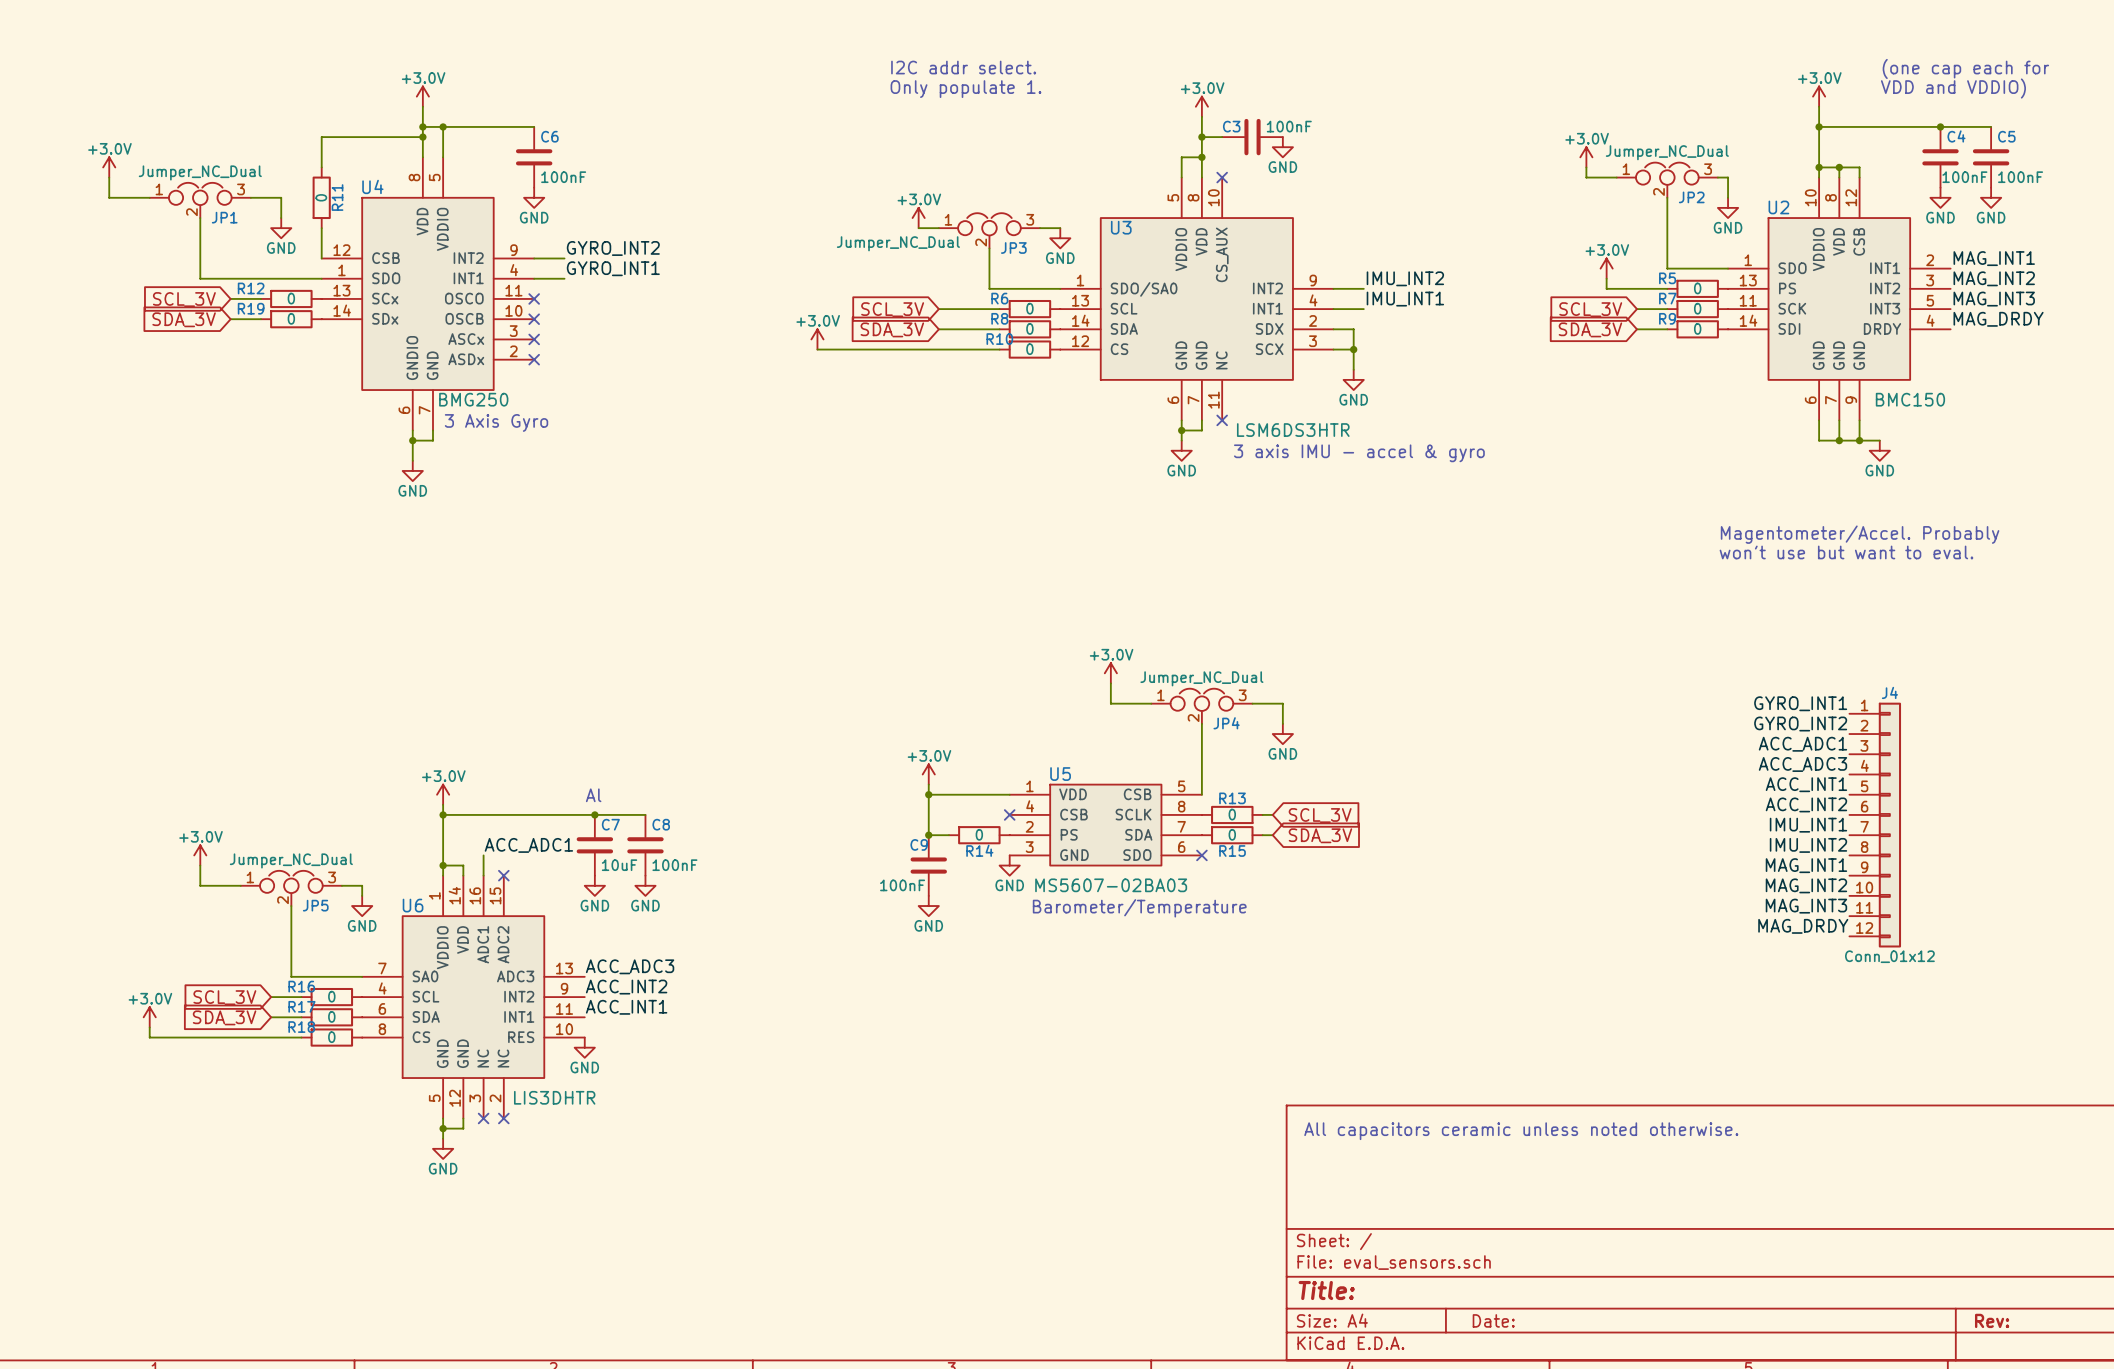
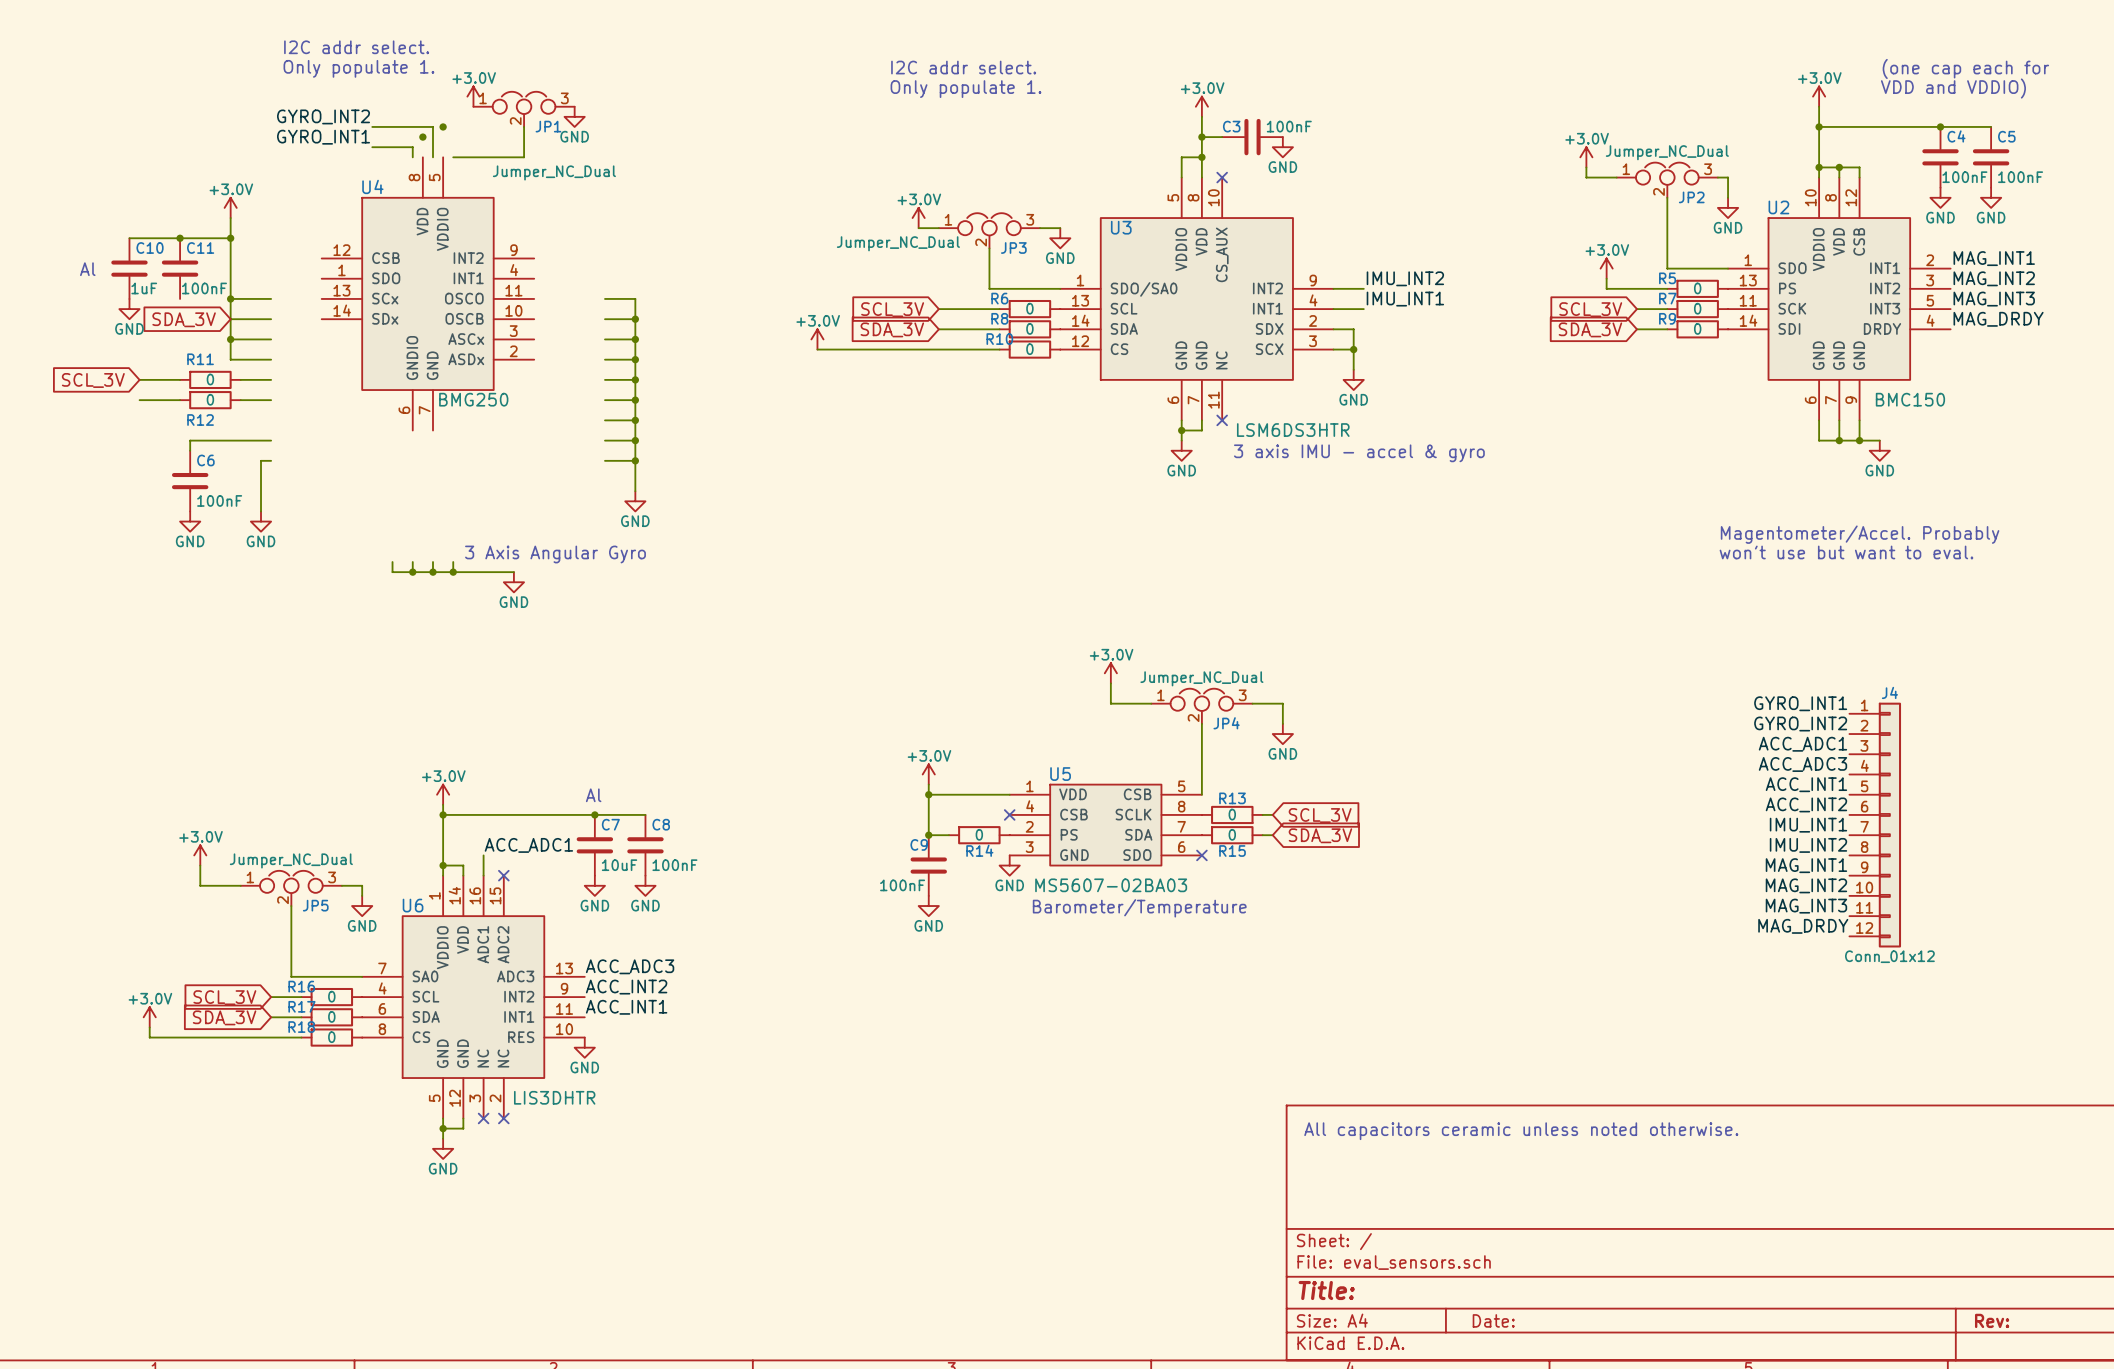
text: none -> I2C addr select. (356, 47)
text: none -> Only populate 1. (358, 68)
power symbol position: +3.0V (422, 96) -> +3.0V (473, 96)
wire: (422, 106) (422, 157) -> none
label: none -> GYRO_INT2 (323, 116)
wire: none -> (372, 126) (422, 126)
junction: (422, 126) -> none
wire: (433, 126) (534, 126) -> (433, 126) (433, 157)
wire: (443, 126) (443, 157) -> none
wire: none -> (524, 126) (524, 157) (453, 157)
label: none -> GYRO_INT1 (323, 137)
wire: (422, 137) (321, 137) (321, 167) -> none
wire: none -> (372, 147) (412, 147) (412, 157)
C6 position: (534, 157) -> (190, 481)
power symbol: +3.0V (109, 167) -> none
JP1 value position: Jumper_NC_Dual (200, 172) -> Jumper_NC_Dual (554, 172)
wire: (109, 177) (109, 197) (149, 197) -> none
wire: (250, 197) (281, 197) (281, 218) -> none
R11 rotation: 0° (321, 197) -> 90° clockwise (210, 379)
R11 position: (321, 197) -> (210, 379)
R11 name position: R11 (337, 197) -> R11 (200, 359)
power symbol position: GND (534, 197) -> GND (574, 116)
JP1 position: (200, 200) -> (524, 109)
power symbol: none -> +3.0V (230, 207)
wire: (200, 218) (200, 278) (321, 278) -> none
wire: none -> (230, 218) (230, 359) (271, 359)
power symbol: GND (281, 228) -> none
wire: (321, 228) (321, 258) -> none
wire: none -> (129, 238) (230, 238)
junction: none -> (180, 238)
junction: none -> (230, 238)
label: GYRO_INT2 (613, 248) -> none
wire: (534, 258) (564, 258) -> (604, 319) (635, 319)
C10: none -> 1uF (129, 268)
C11: none -> 100nF (180, 268)
label: GYRO_INT1 (613, 268) -> none
text: none -> Al (87, 269)
wire: (534, 278) (564, 278) -> (604, 339) (635, 339)
R12 name position: R12 (251, 288) -> R12 (200, 420)
junction: none -> (230, 298)
R12 position: (291, 298) -> (210, 400)
no-connect mark: (534, 298) -> none
wire: none -> (604, 298) (635, 298) (635, 491)
global label position: SCL_3V (184, 299) -> SCL_3V (93, 380)
power symbol: none -> GND (129, 309)
R19: 0 (291, 319) -> none
no-connect mark: (534, 319) -> none
junction: none -> (635, 319)
wire: none -> (230, 339) (271, 339)
junction: none -> (230, 339)
no-connect mark: (534, 339) -> none
junction: none -> (635, 339)
no-connect mark: (534, 359) -> none
wire: none -> (604, 359) (635, 359)
junction: none -> (635, 359)
wire: none -> (139, 379) (180, 379)
wire: none -> (240, 379) (271, 379)
wire: none -> (604, 379) (635, 379)
junction: none -> (635, 379)
wire: none -> (139, 400) (180, 400)
wire: none -> (240, 400) (271, 400)
wire: none -> (604, 400) (635, 400)
junction: none -> (635, 400)
wire: none -> (604, 420) (635, 420)
junction: none -> (635, 420)
text: 3 Axis Gyro (496, 422) -> none
wire: (412, 430) (412, 460) -> none
wire: (433, 430) (433, 440) (412, 440) -> none
wire: none -> (271, 440) (190, 440) (190, 450)
junction: (412, 440) -> none
wire: none -> (604, 440) (635, 440)
junction: none -> (635, 440)
wire: none -> (271, 460) (261, 460) (261, 511)
wire: none -> (604, 460) (635, 460)
junction: none -> (635, 460)
power symbol: GND (412, 470) -> none
power symbol: none -> GND (635, 501)
power symbol: none -> GND (190, 521)
power symbol: none -> GND (261, 521)
text: none -> 3 Axis Angular Gyro (555, 554)
wire: none -> (392, 562) (392, 572) (513, 572)
wire: none -> (412, 562) (412, 572)
wire: none -> (433, 562) (433, 572)
wire: none -> (453, 562) (453, 572)
junction: none -> (412, 572)
junction: none -> (433, 572)
junction: none -> (453, 572)
power symbol: none -> GND (513, 582)

